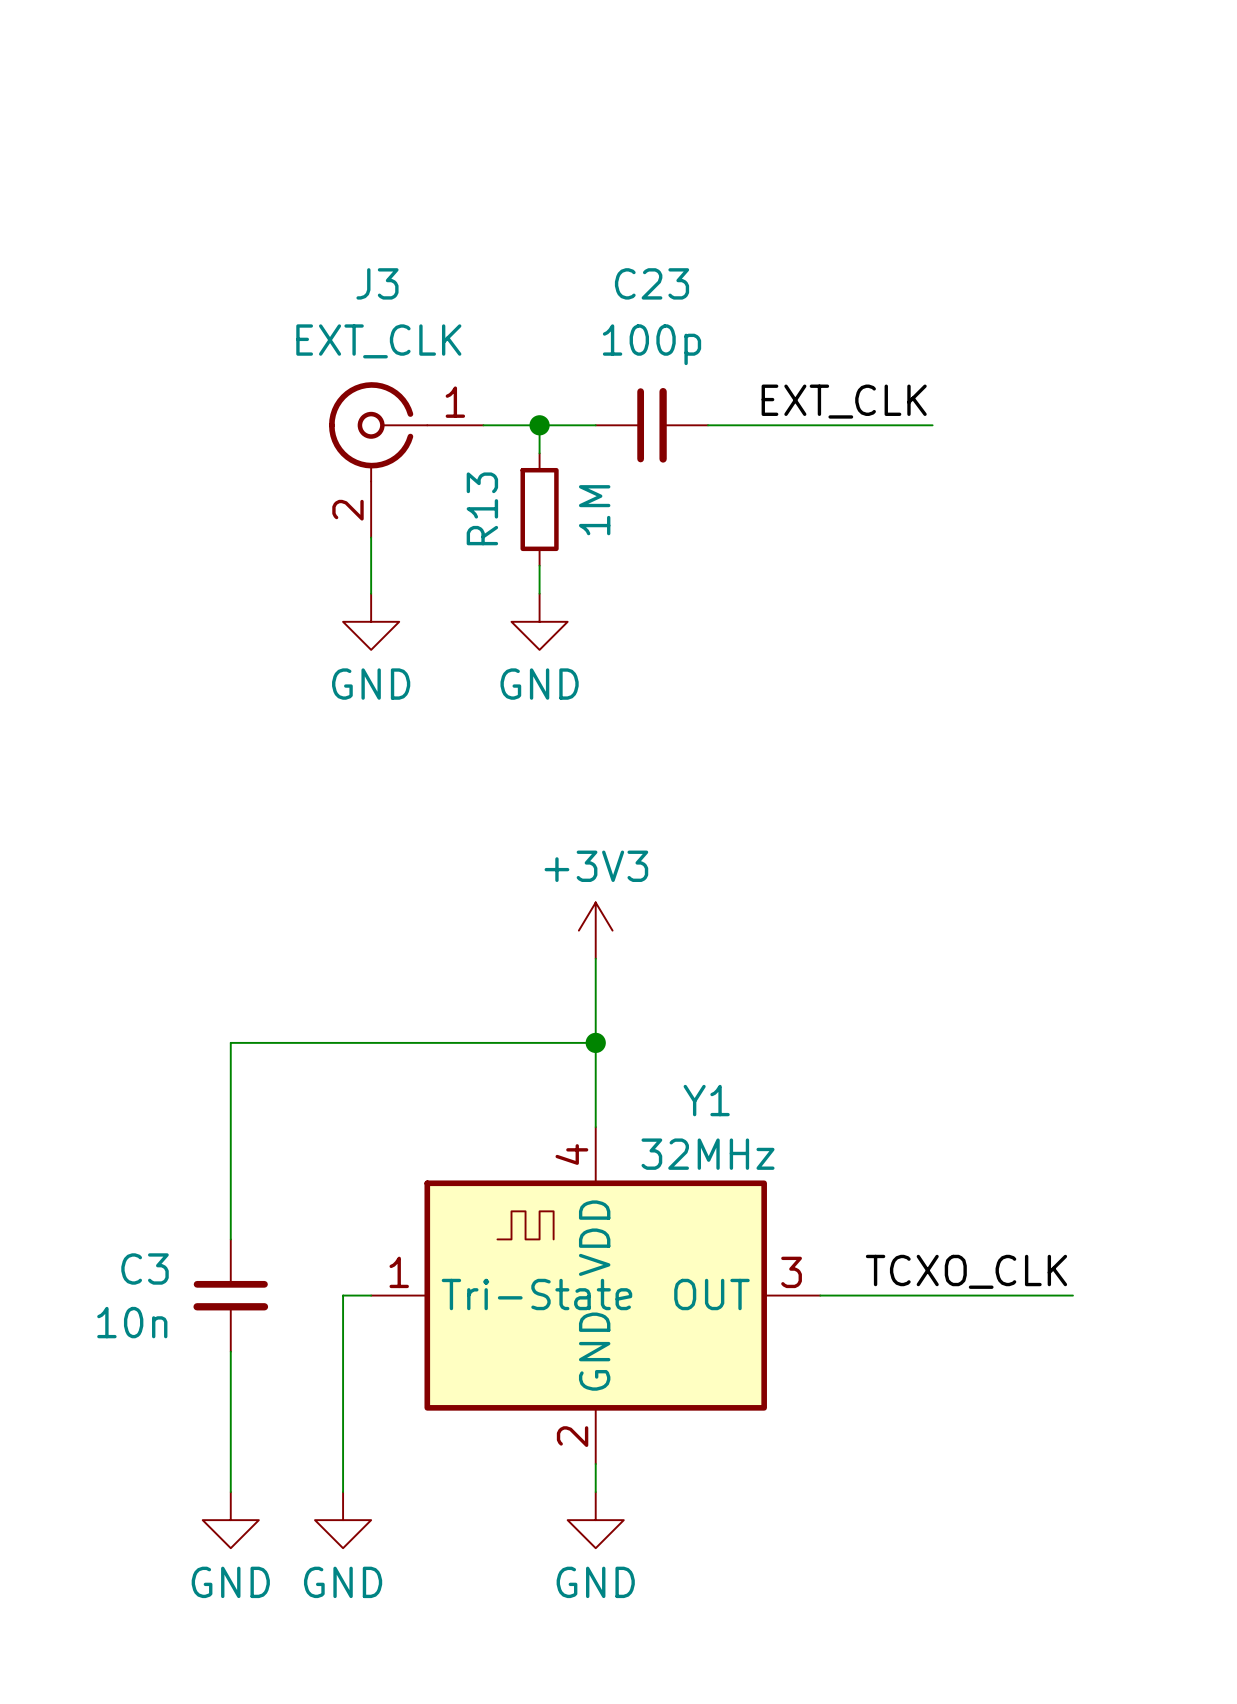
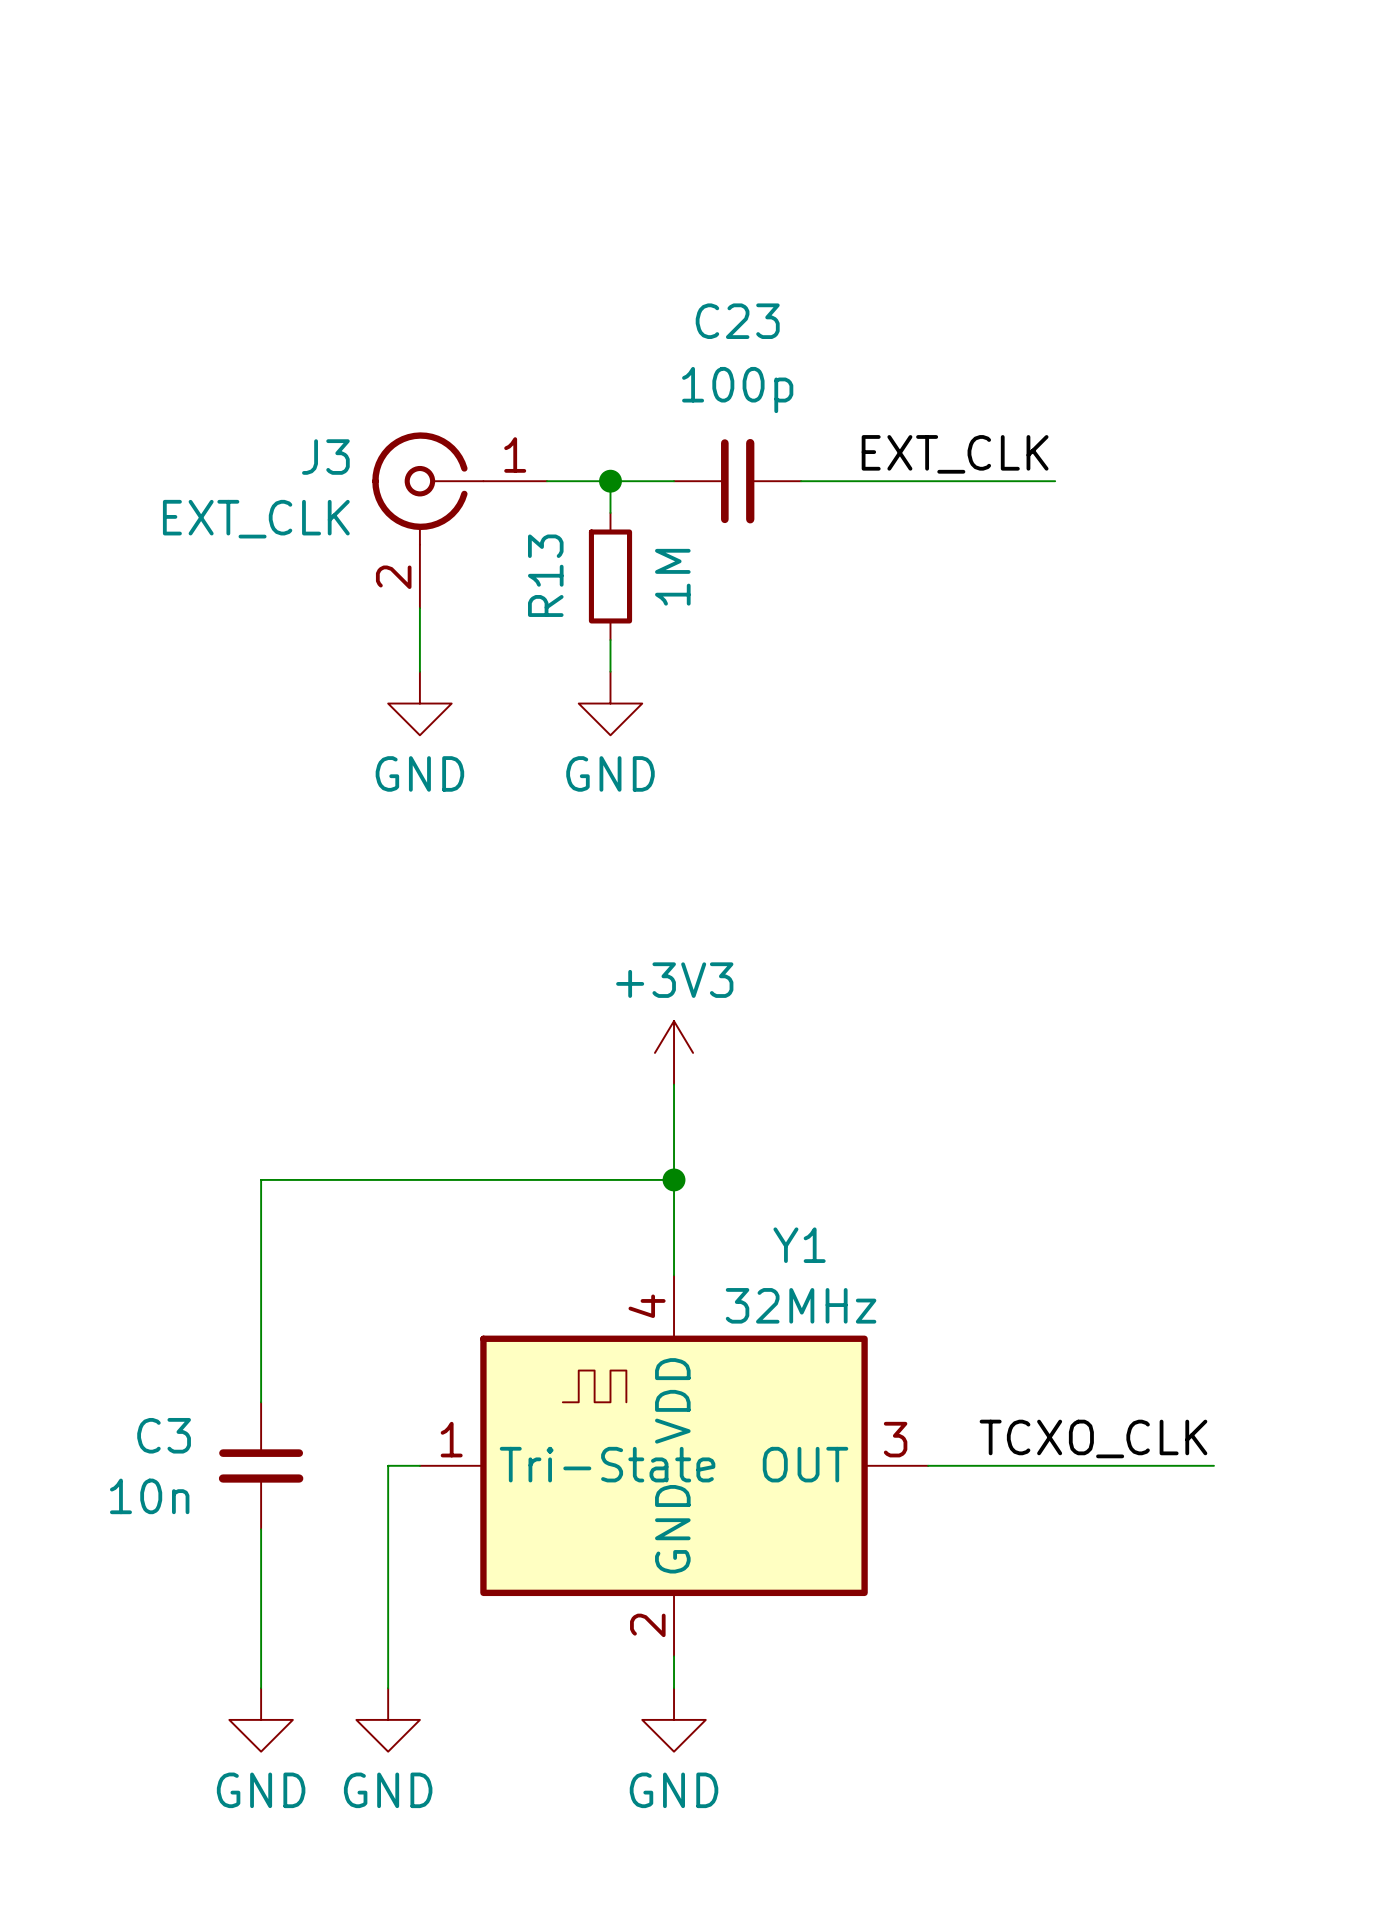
J3 name position: J3 (377, 283) -> J3 (325, 457)
J3 value position: EXT_CLK (378, 341) -> EXT_CLK (256, 519)

